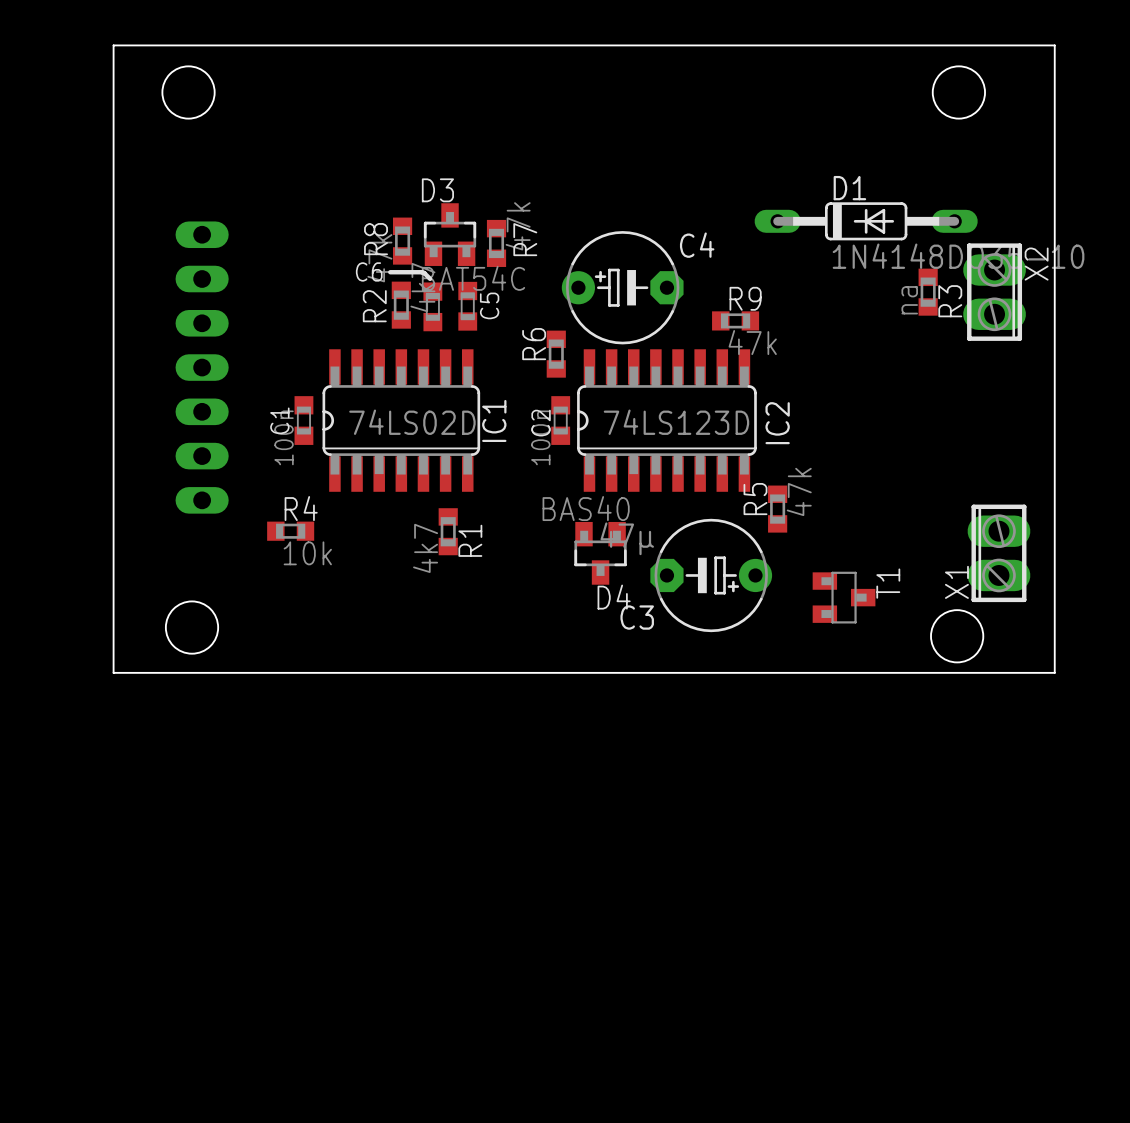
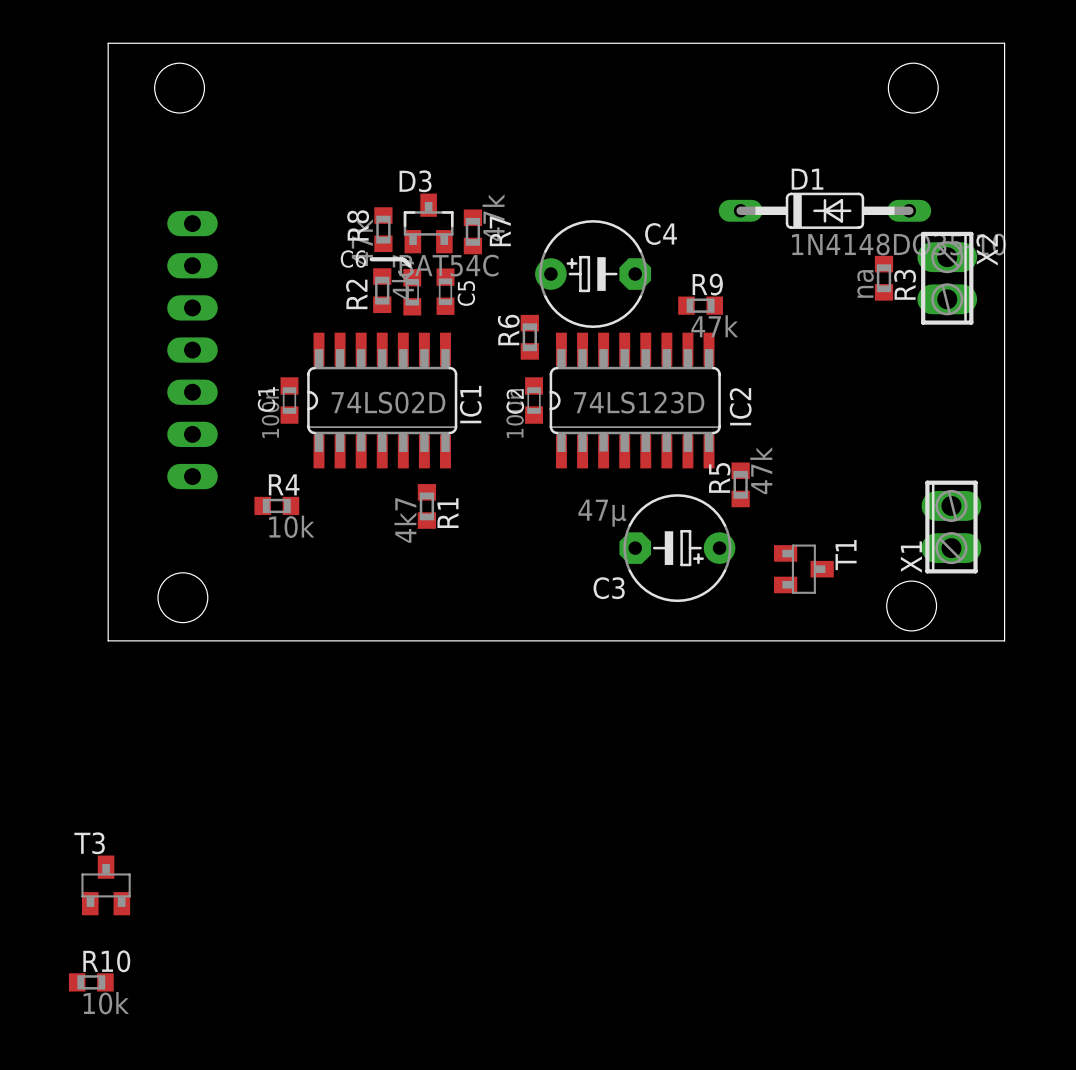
D4: BAS40 (600, 553) -> none
T3: none -> (106, 885)
R10: none -> 10k (91, 982)

